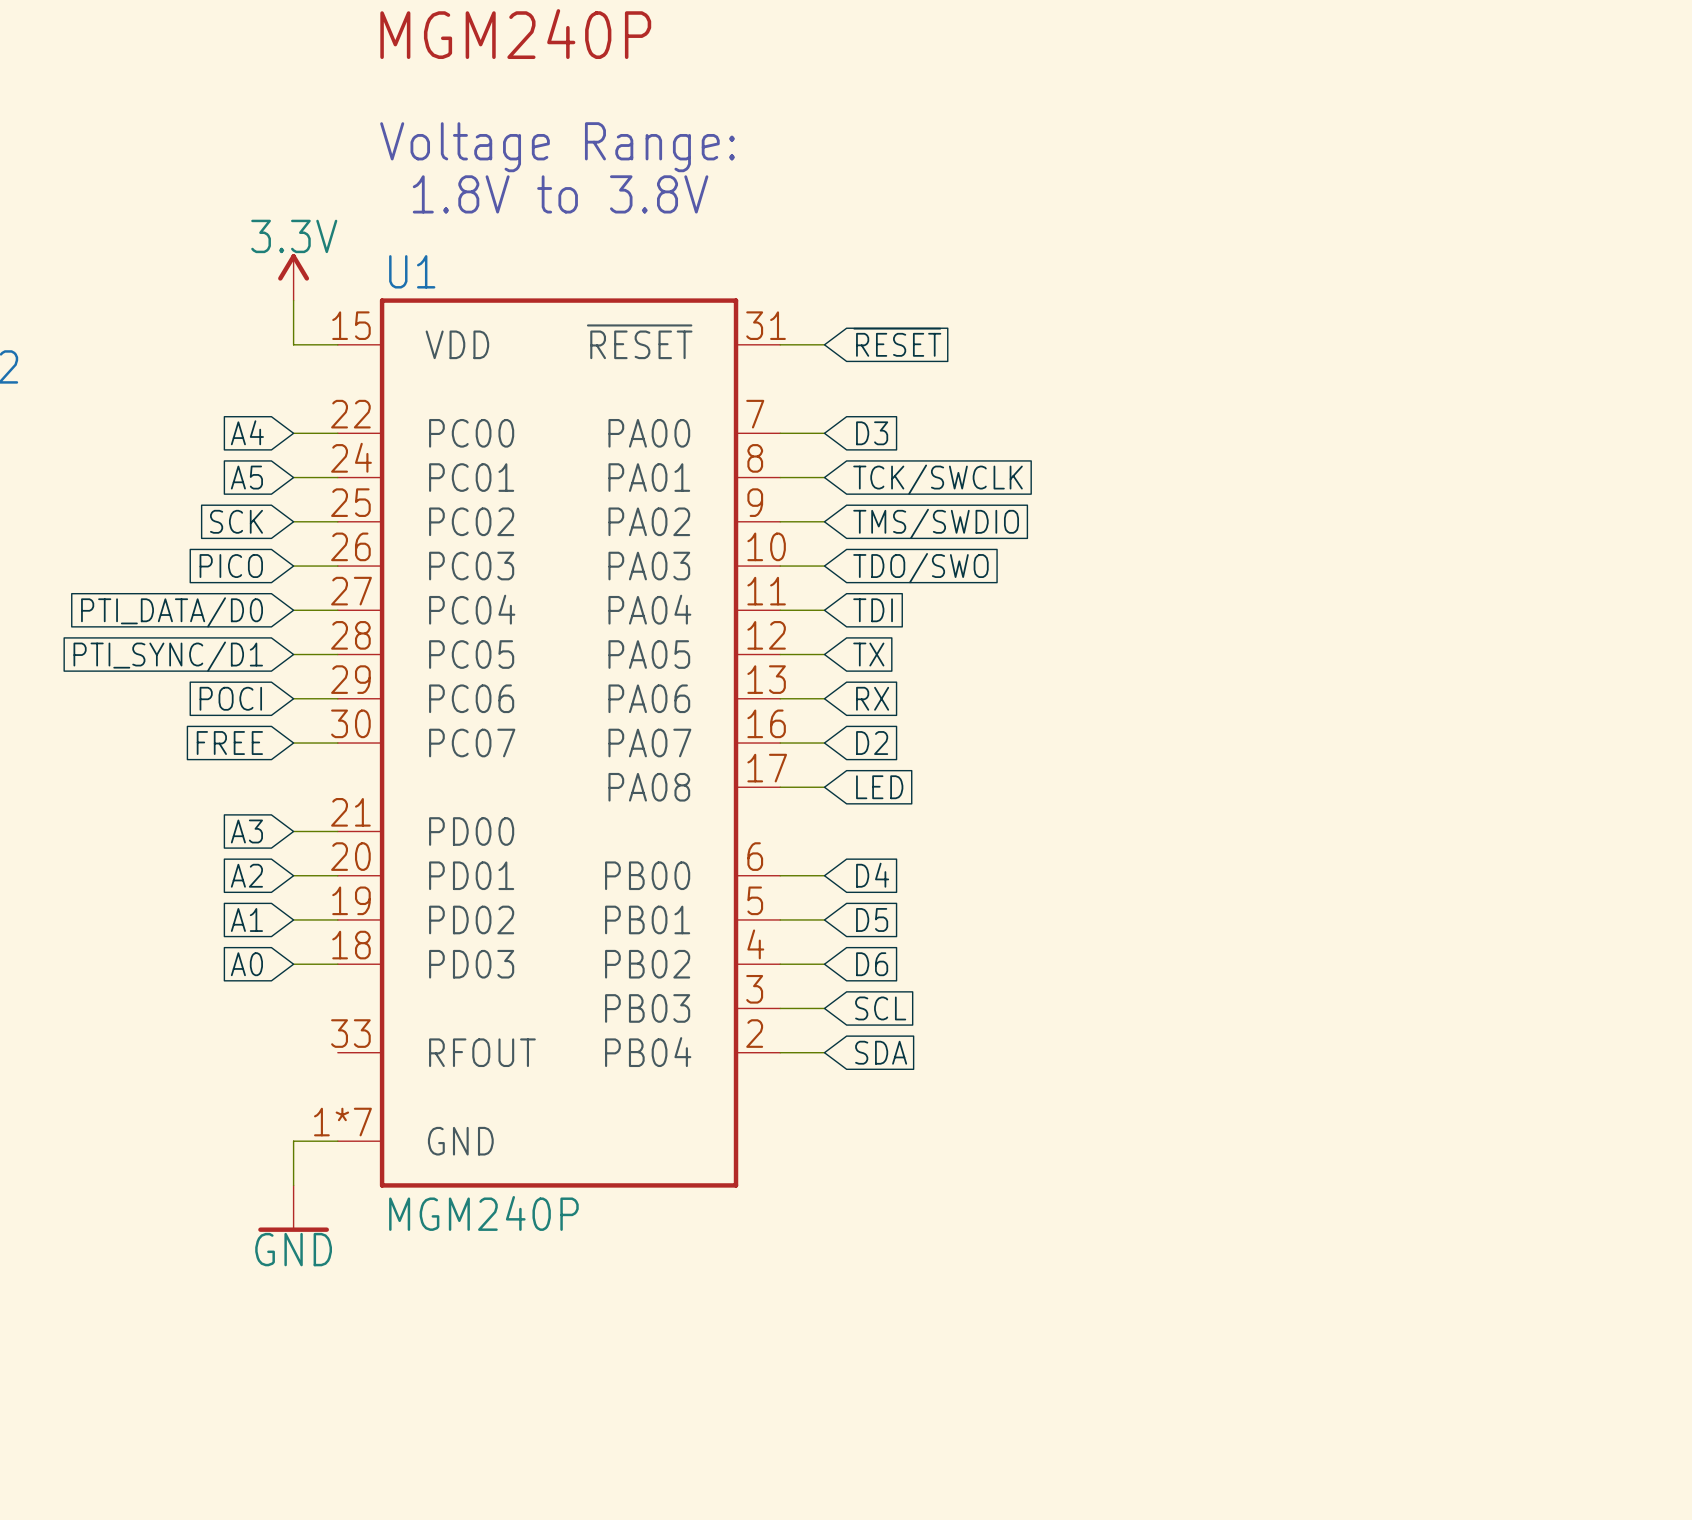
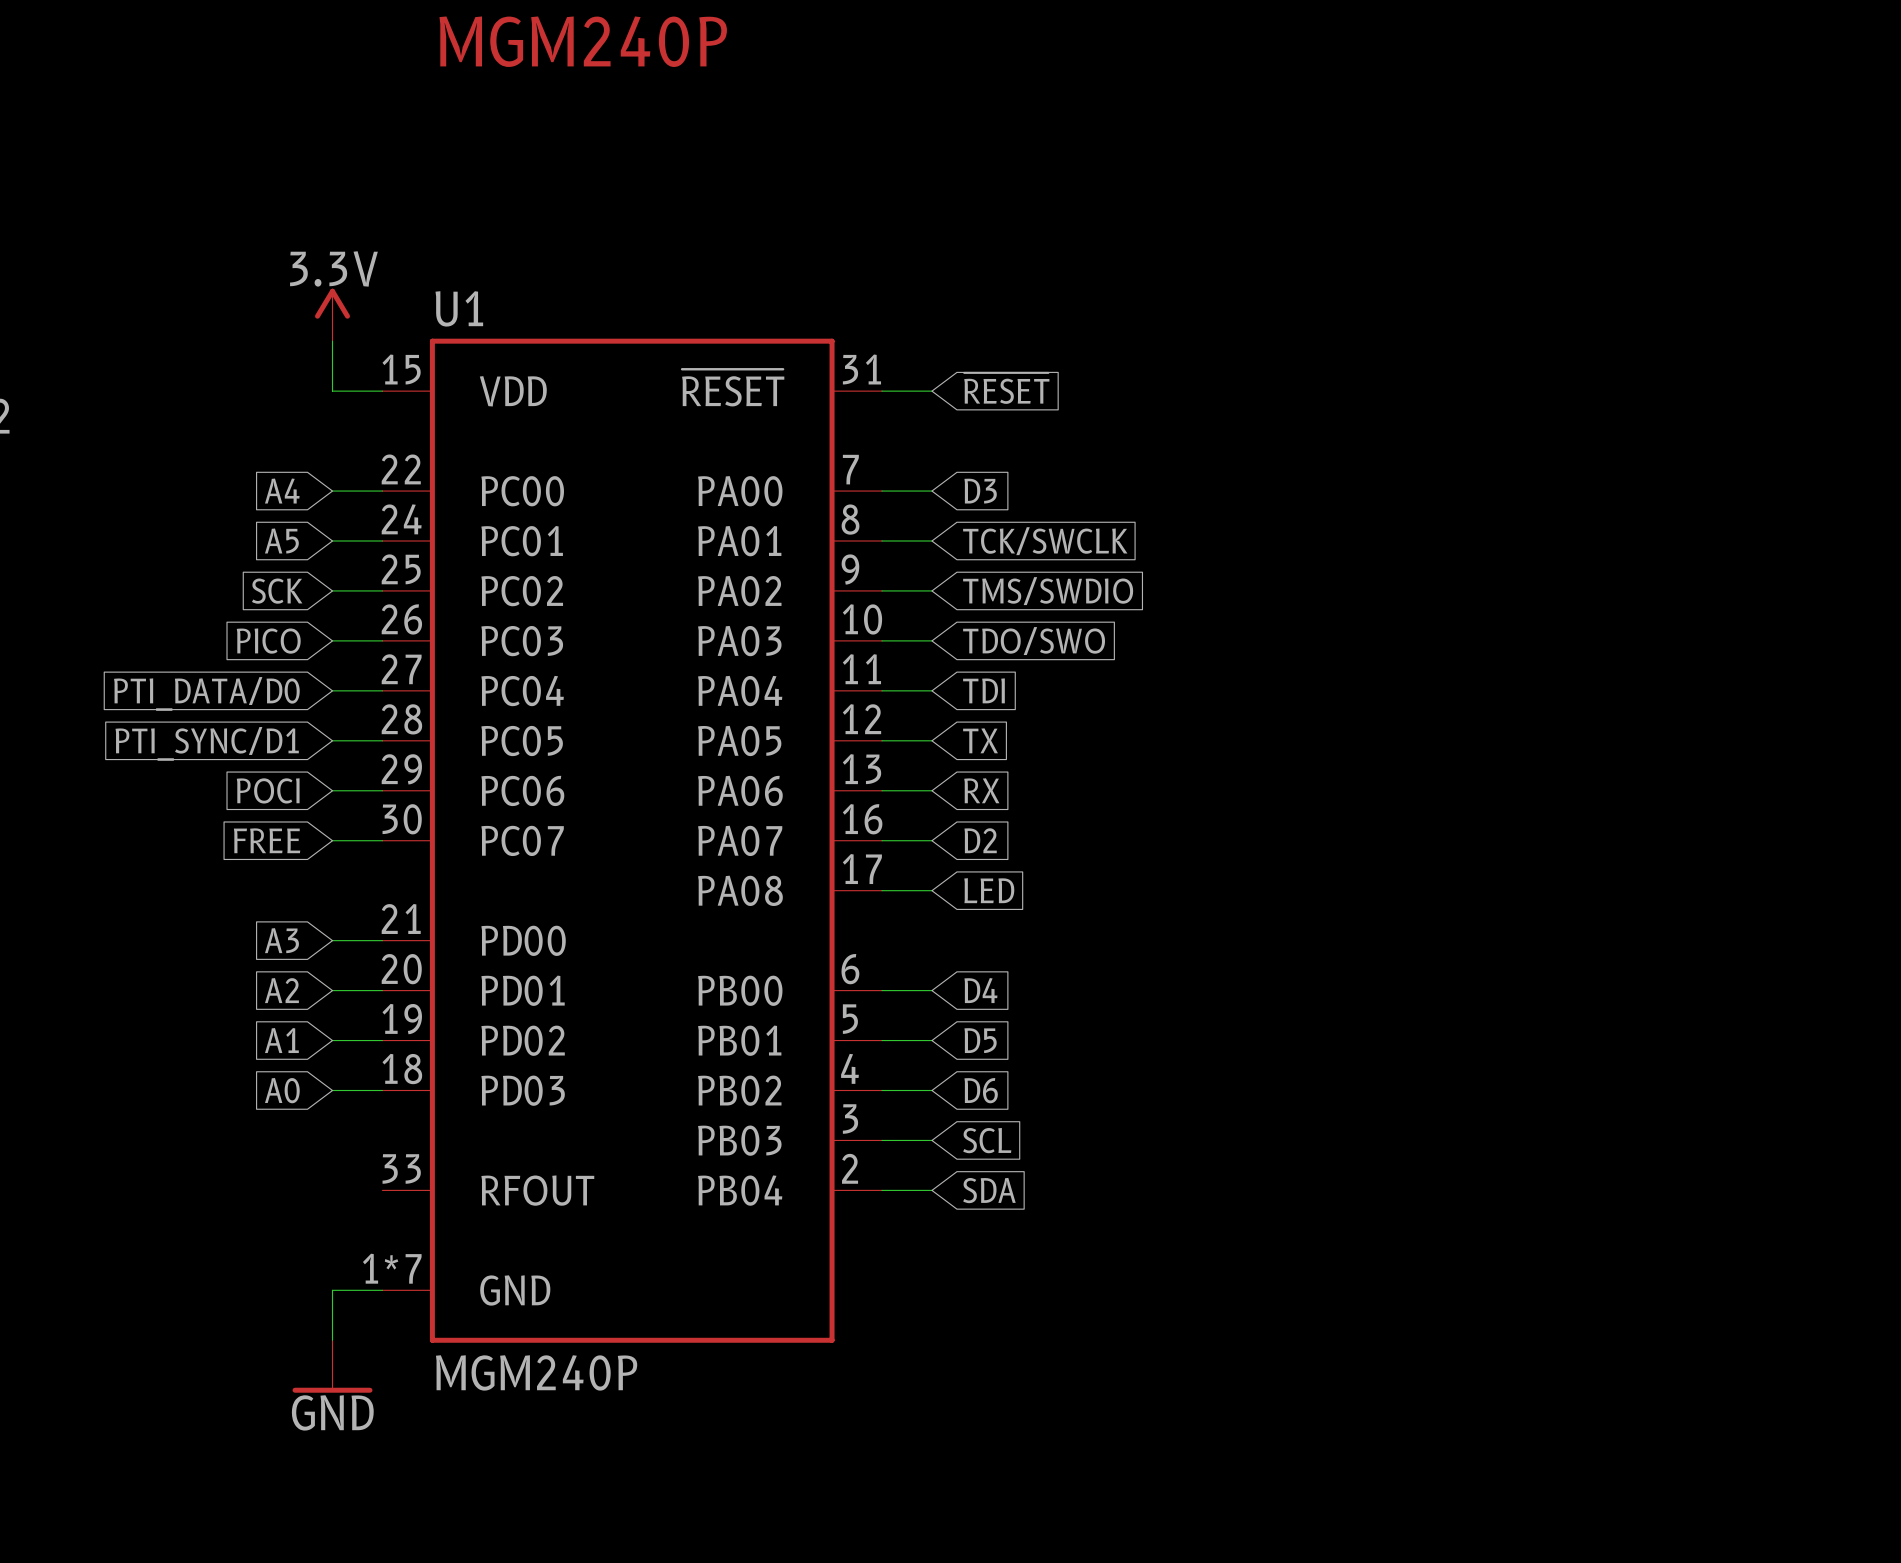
text: Voltage Range: (557, 147) -> none
text: 1.8V to 3.8V (560, 194) -> none

